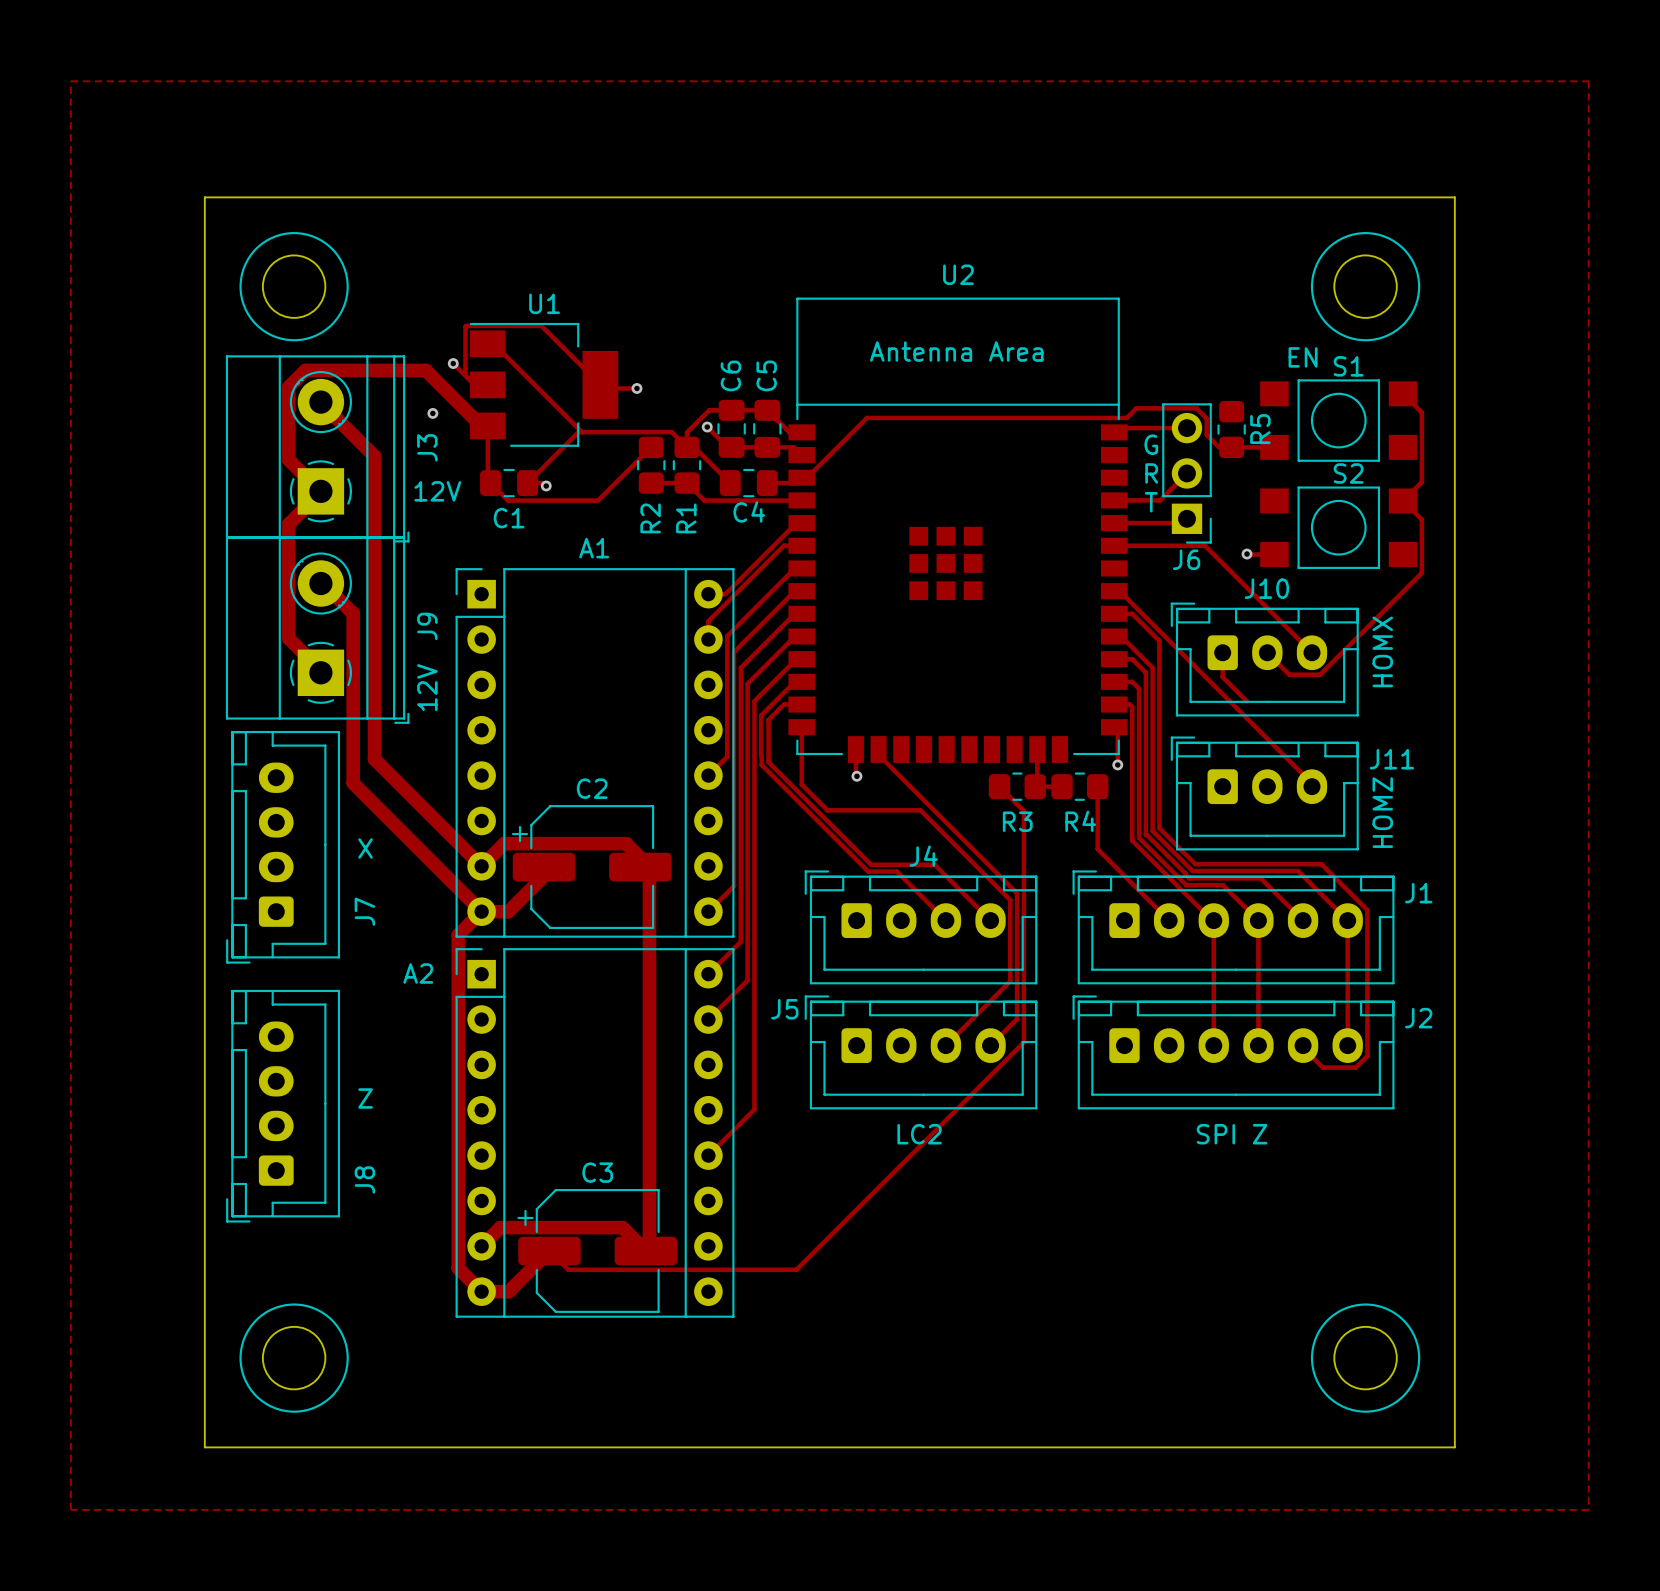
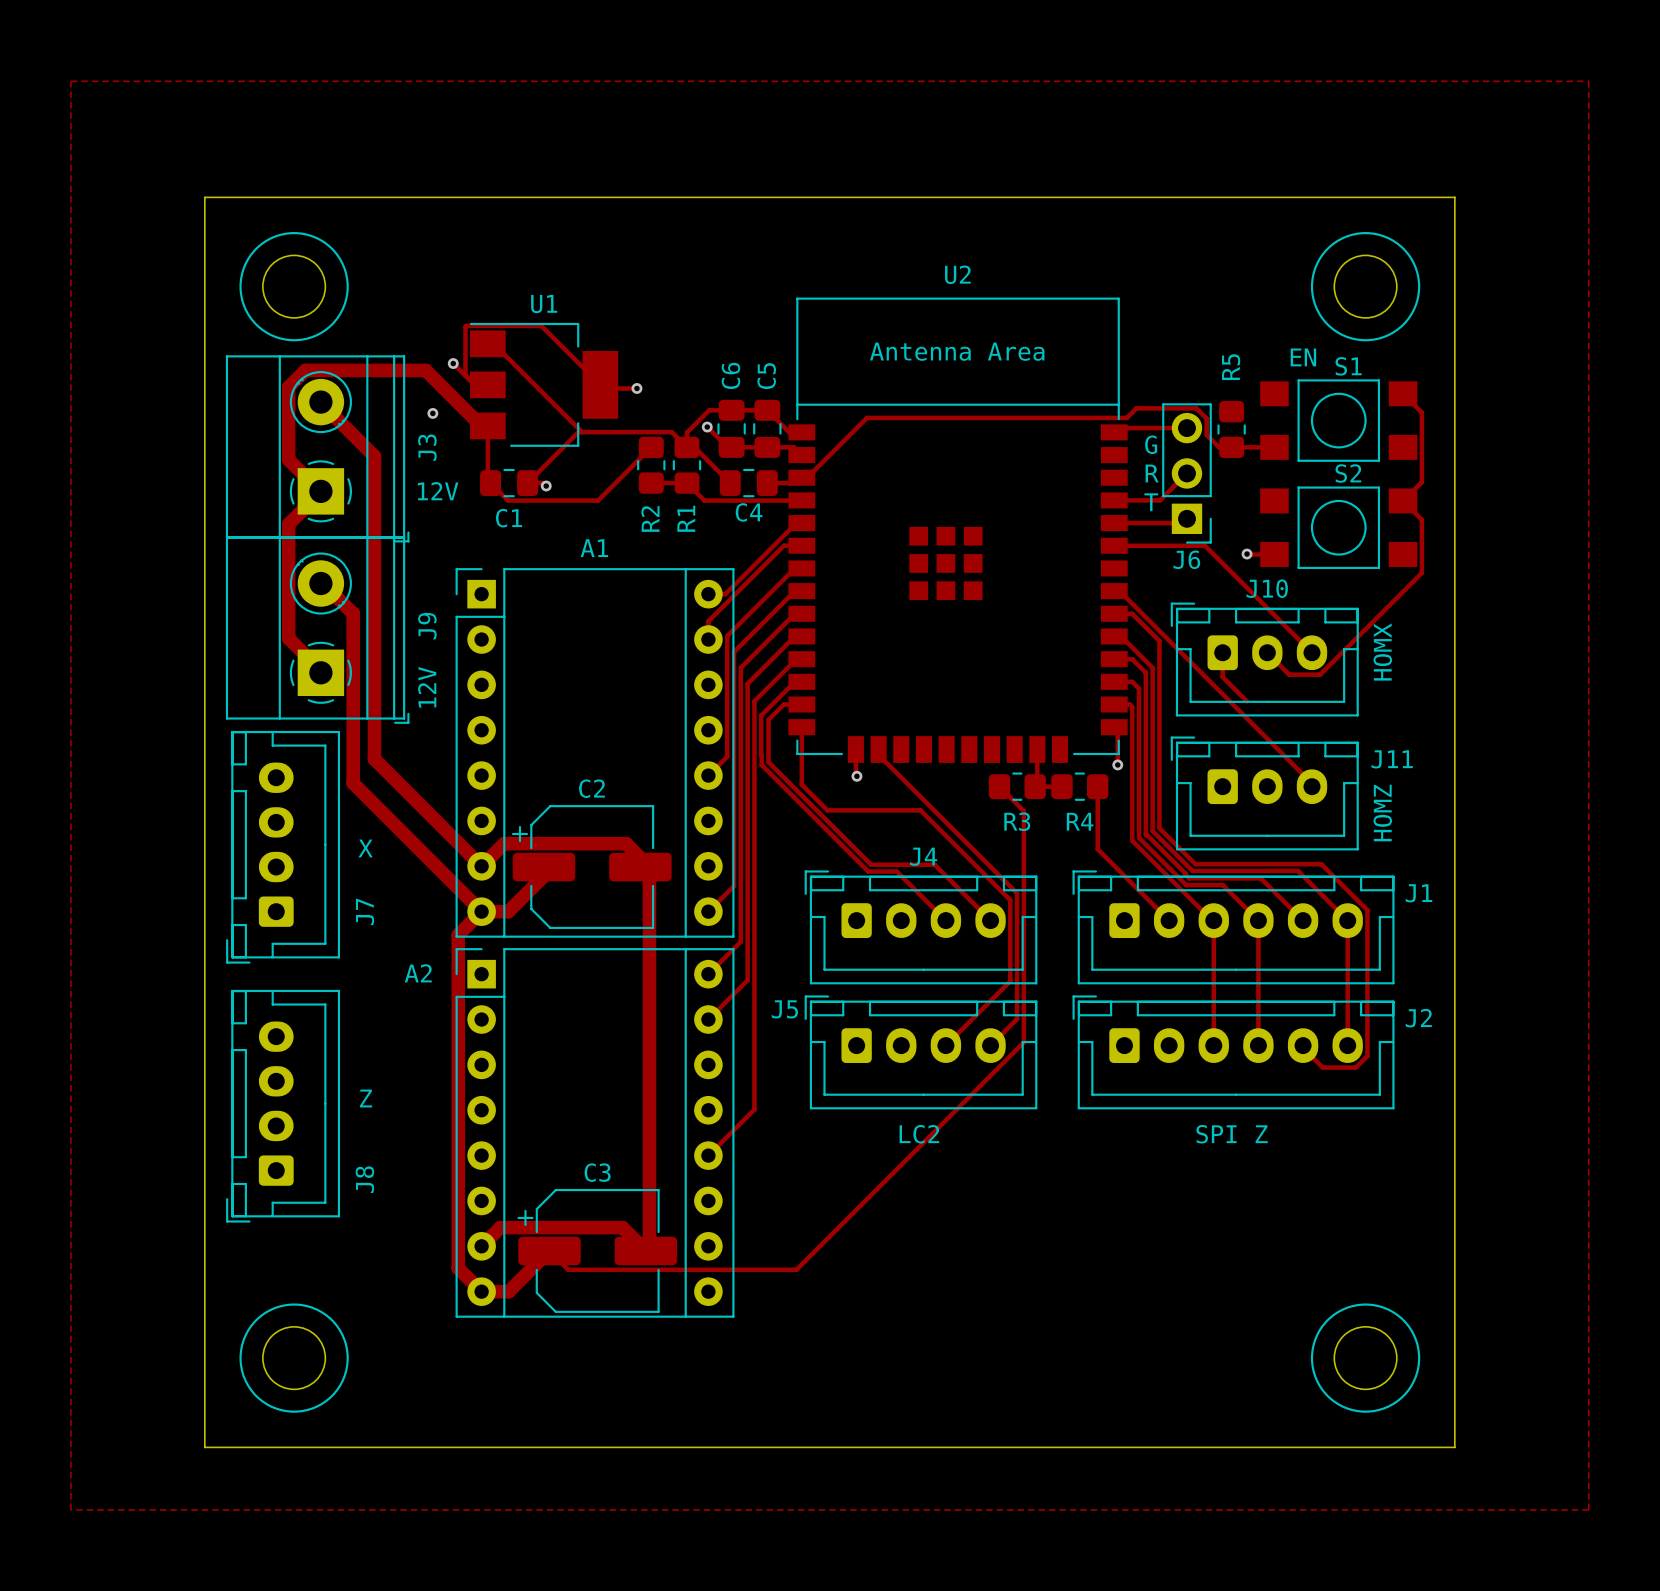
R5 name position: R5 (1260, 429) -> R5 (1231, 367)

